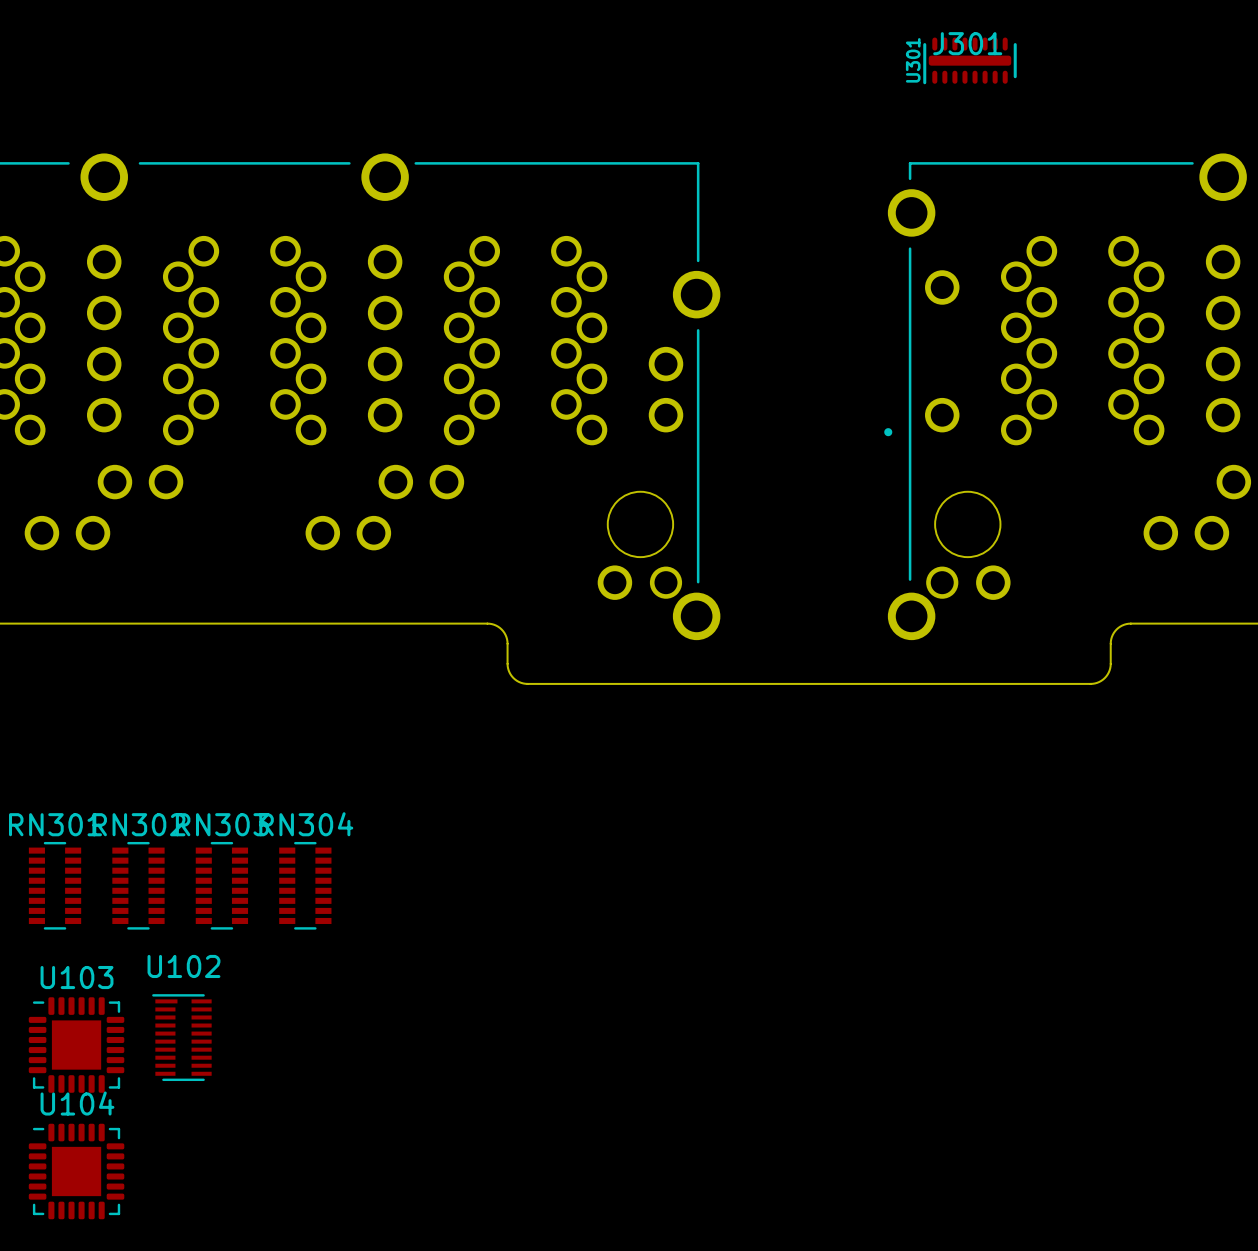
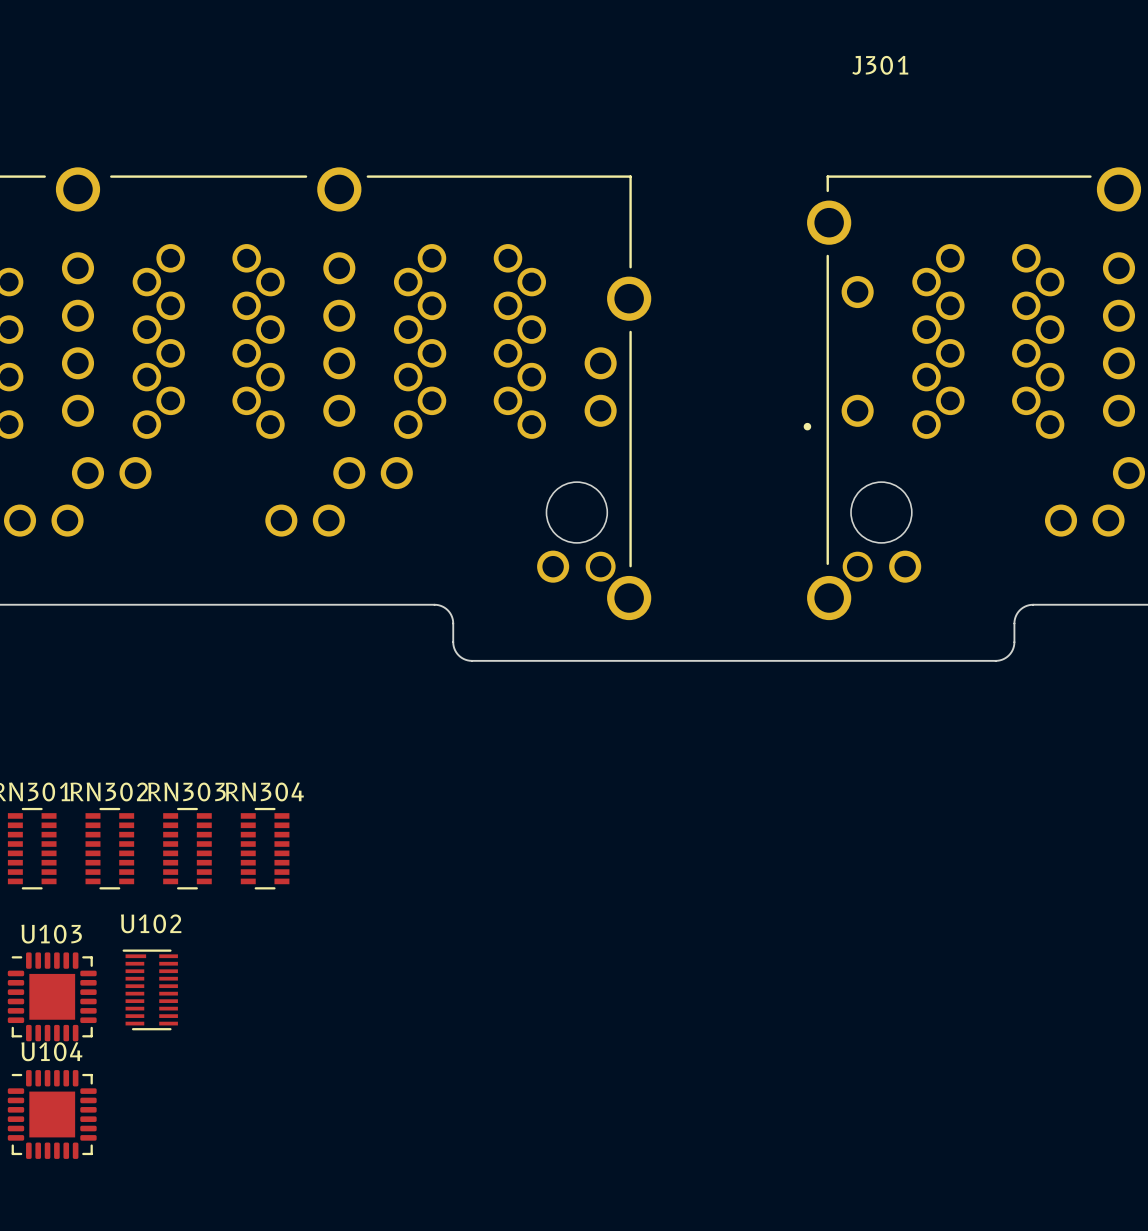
U301: (969, 60) -> none

